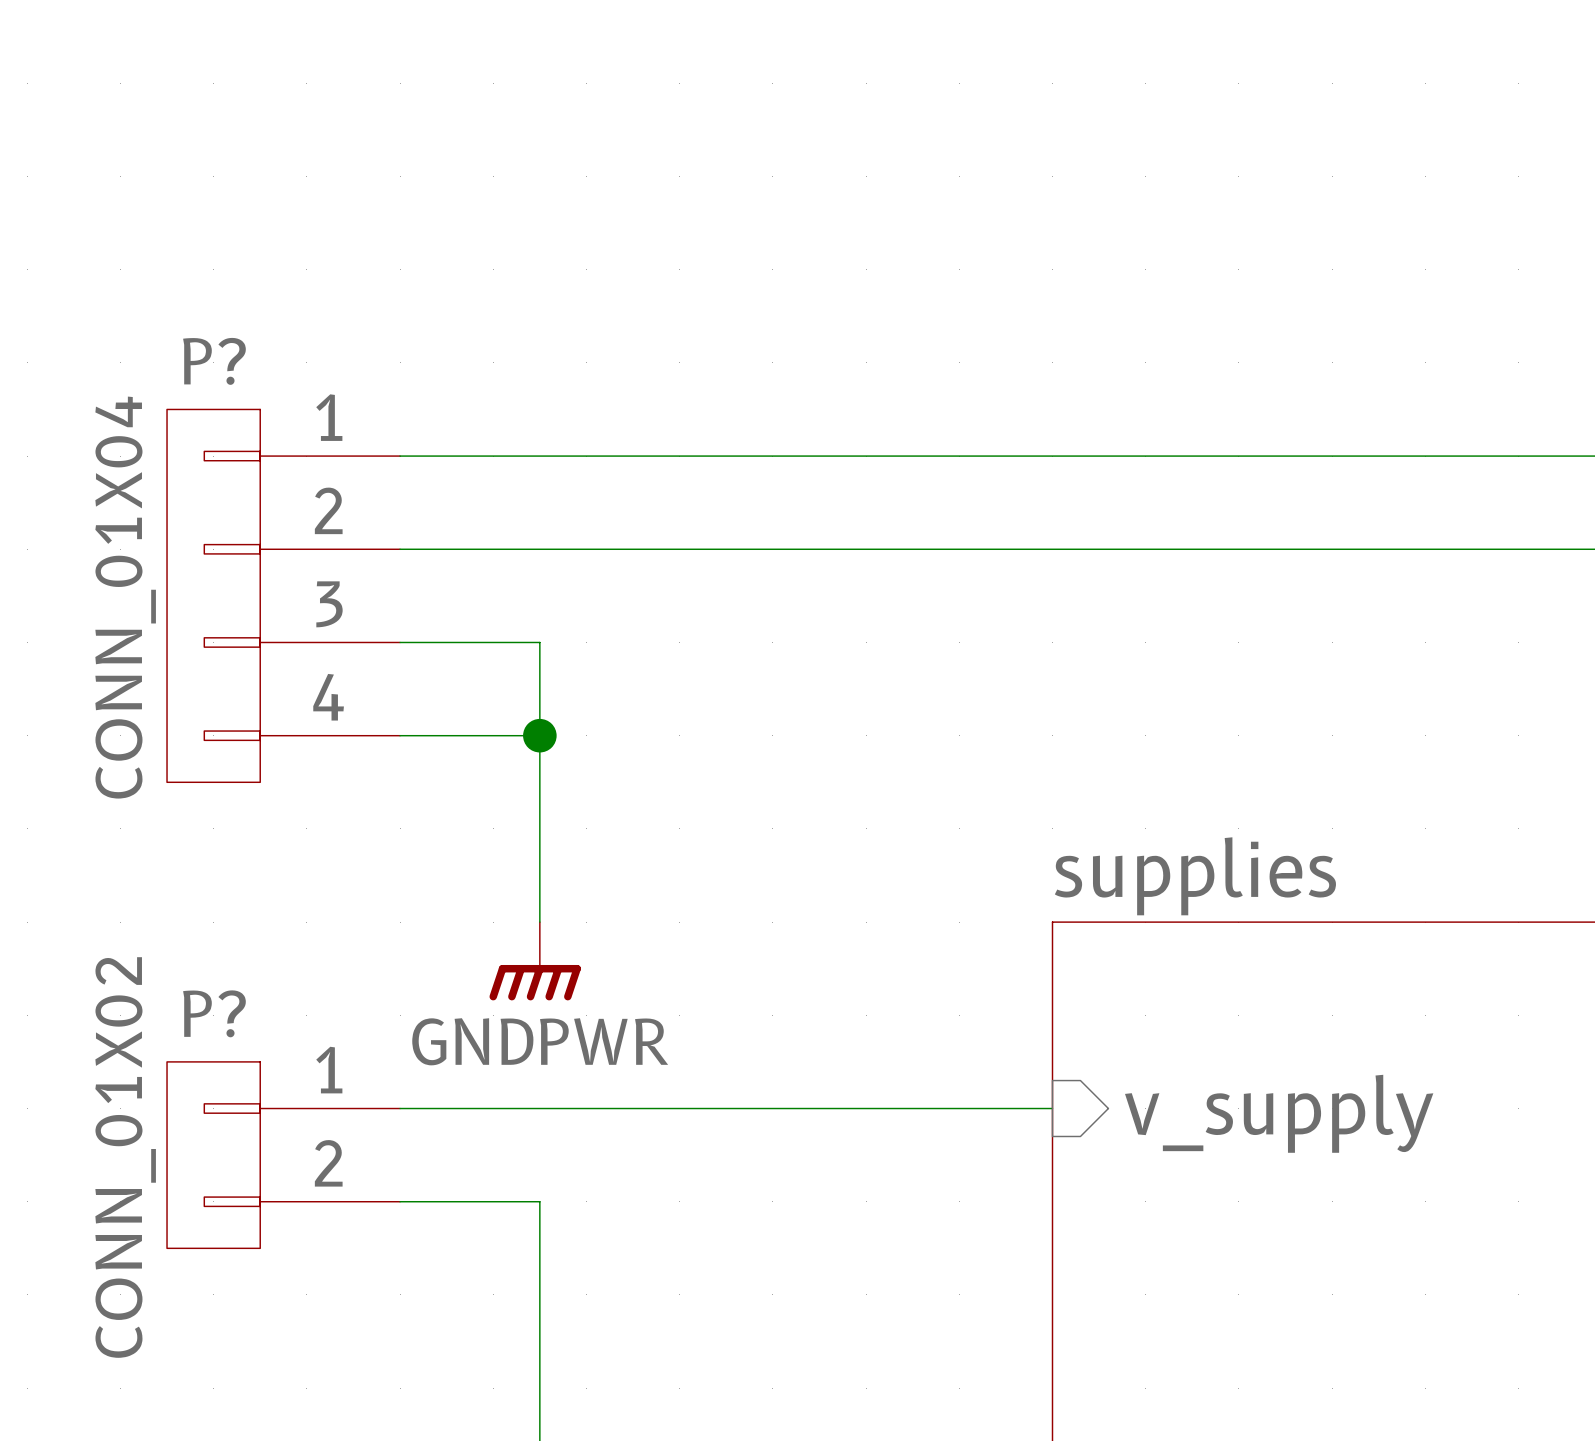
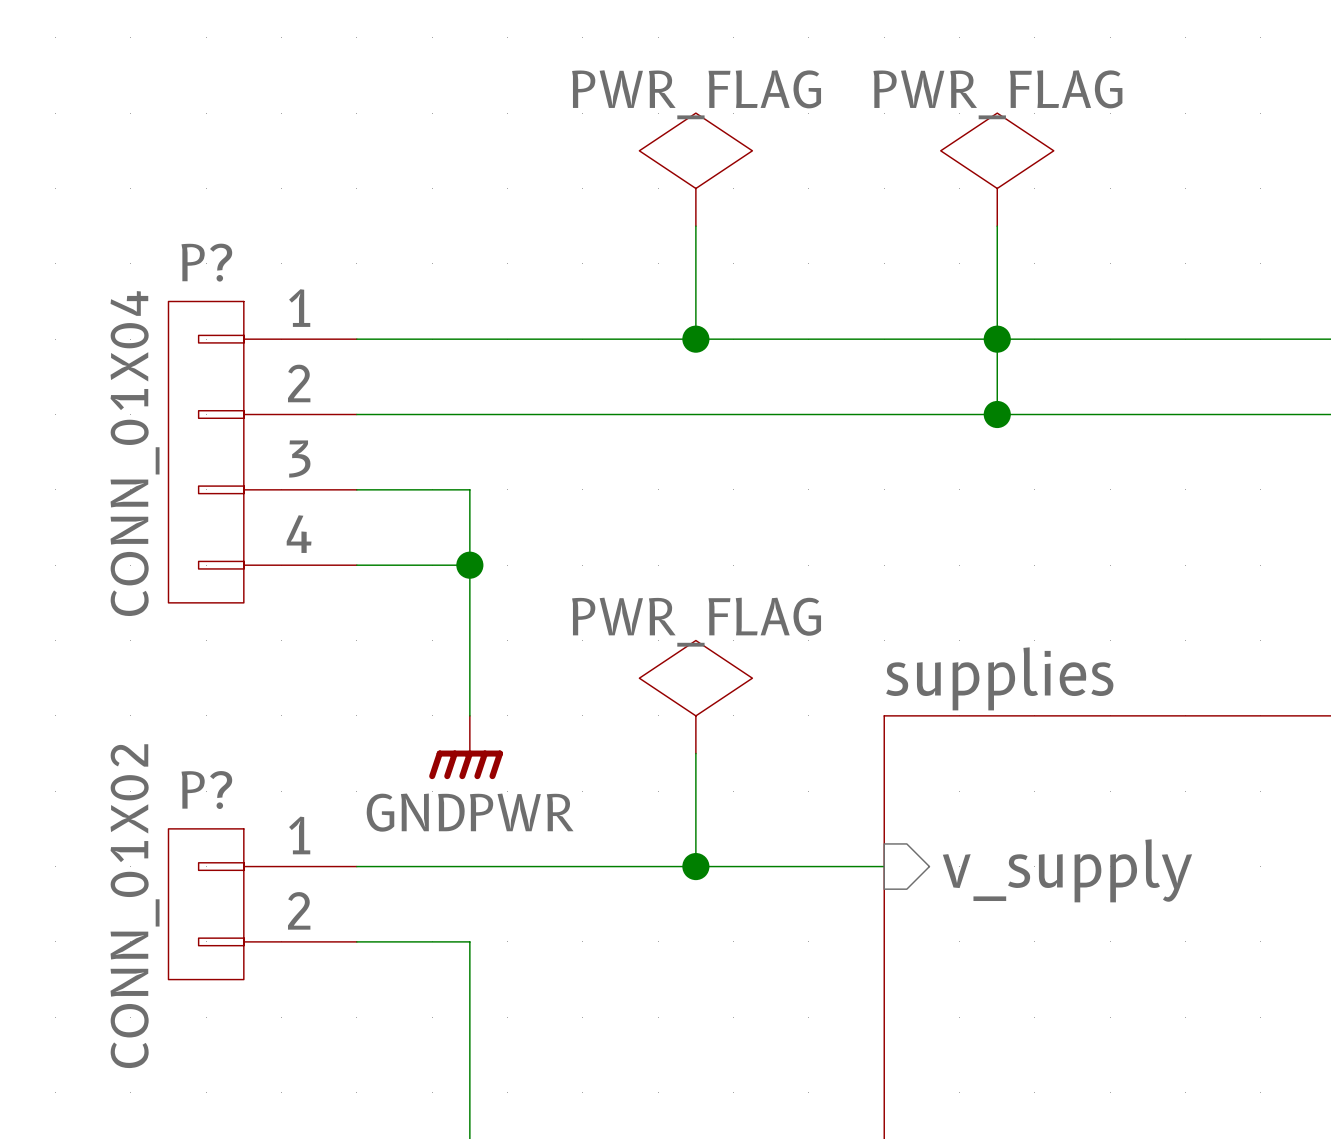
power symbol: none -> PWR_FLAG (695, 169)
power symbol: none -> PWR_FLAG (997, 169)
wire: none -> (695, 226) (695, 339)
wire: none -> (997, 226) (997, 414)
junction: none -> (695, 339)
junction: none -> (997, 339)
junction: none -> (997, 414)
power symbol: none -> PWR_FLAG (695, 697)
wire: none -> (695, 753) (695, 866)
junction: none -> (695, 866)

